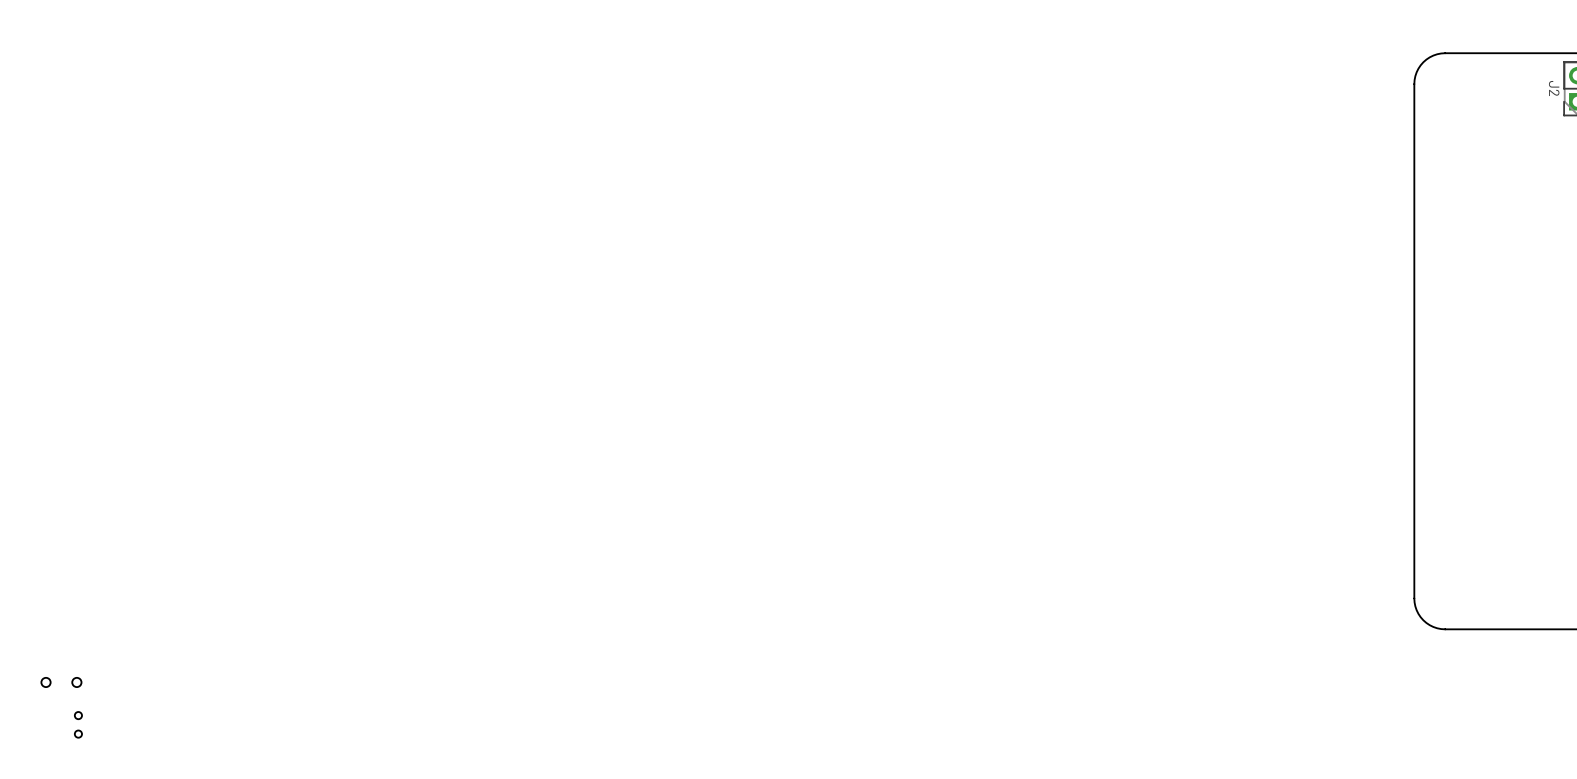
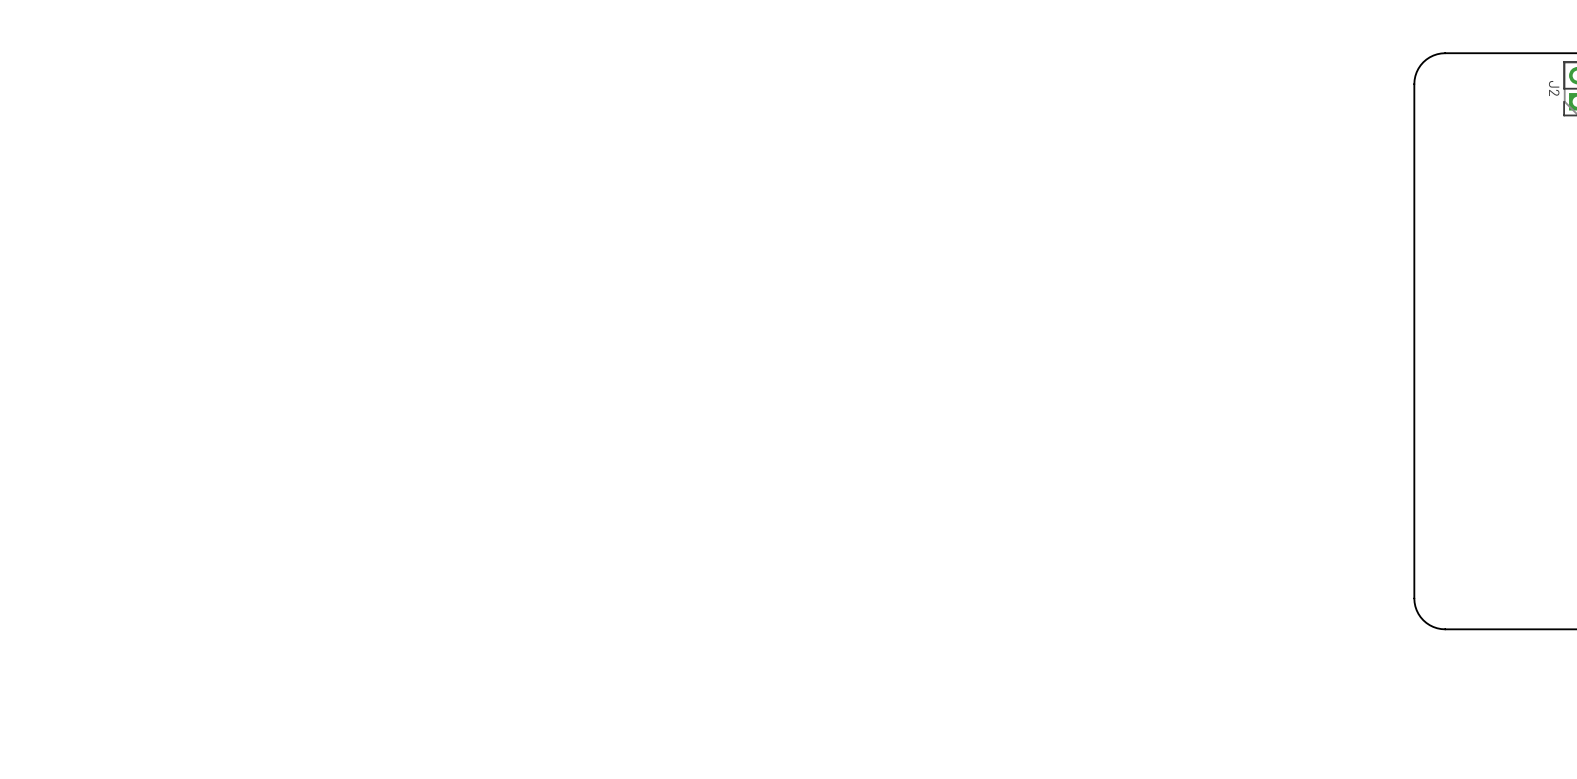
part: (61, 682) -> none
part: (78, 724) -> none

